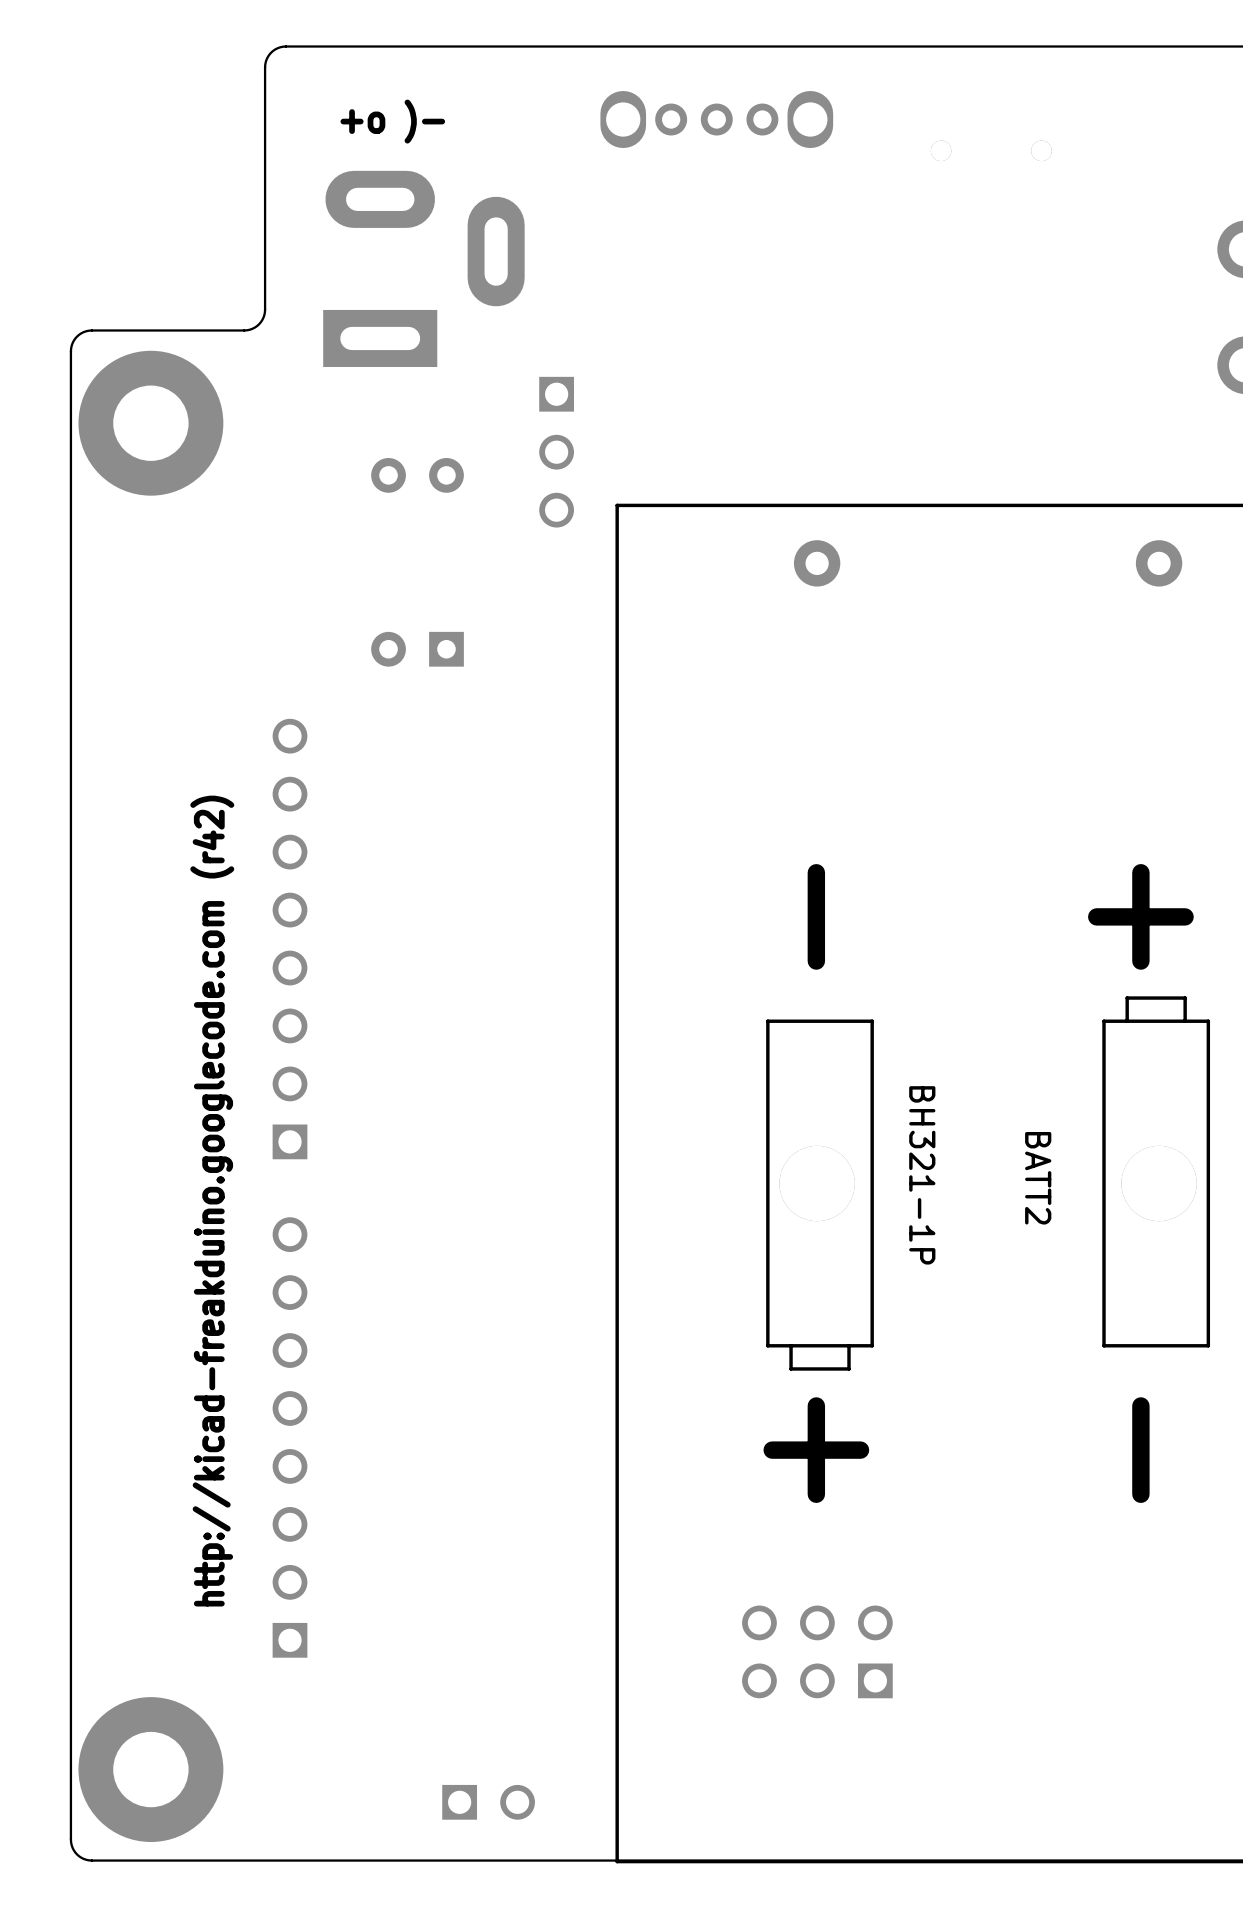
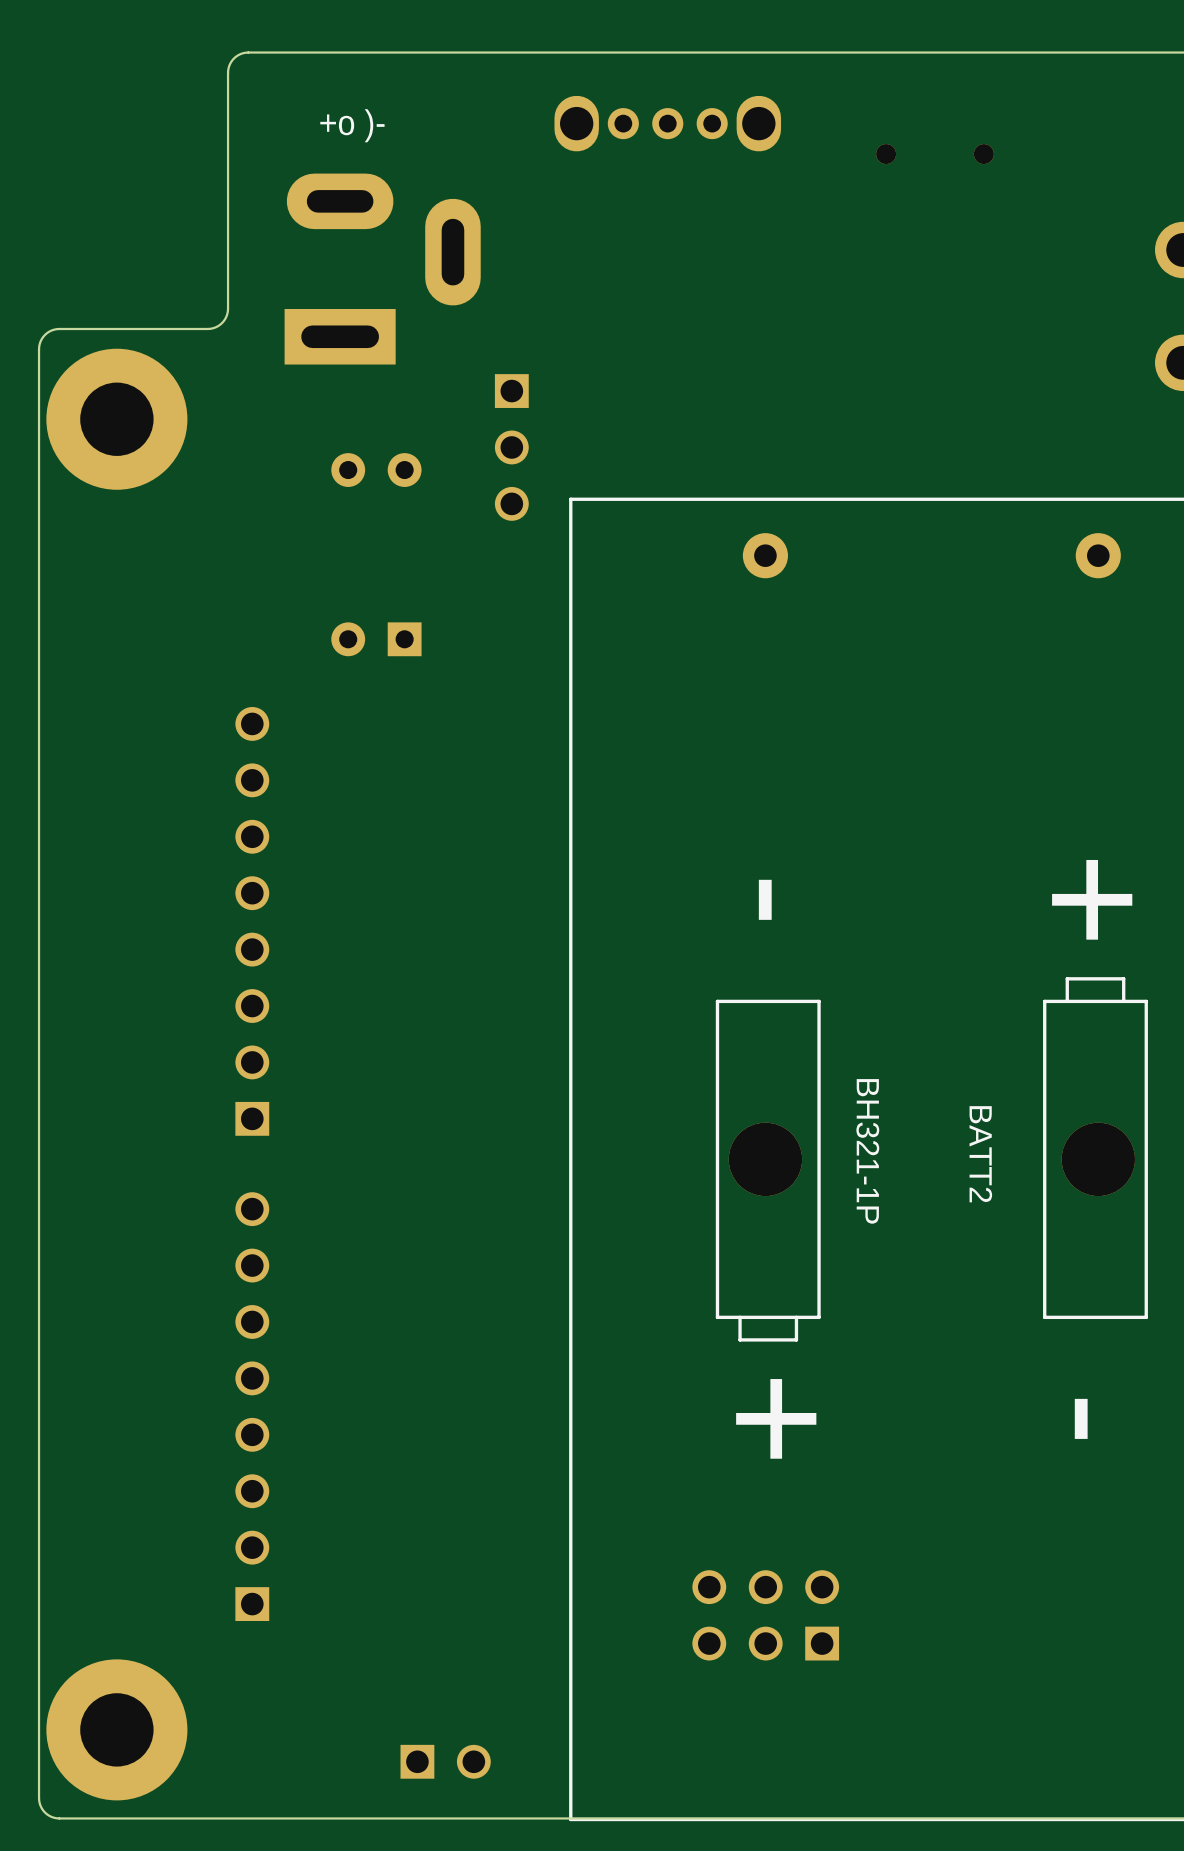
text: http://kicad-freakduino.googlecode.com (r42) (212, 1201) -> none

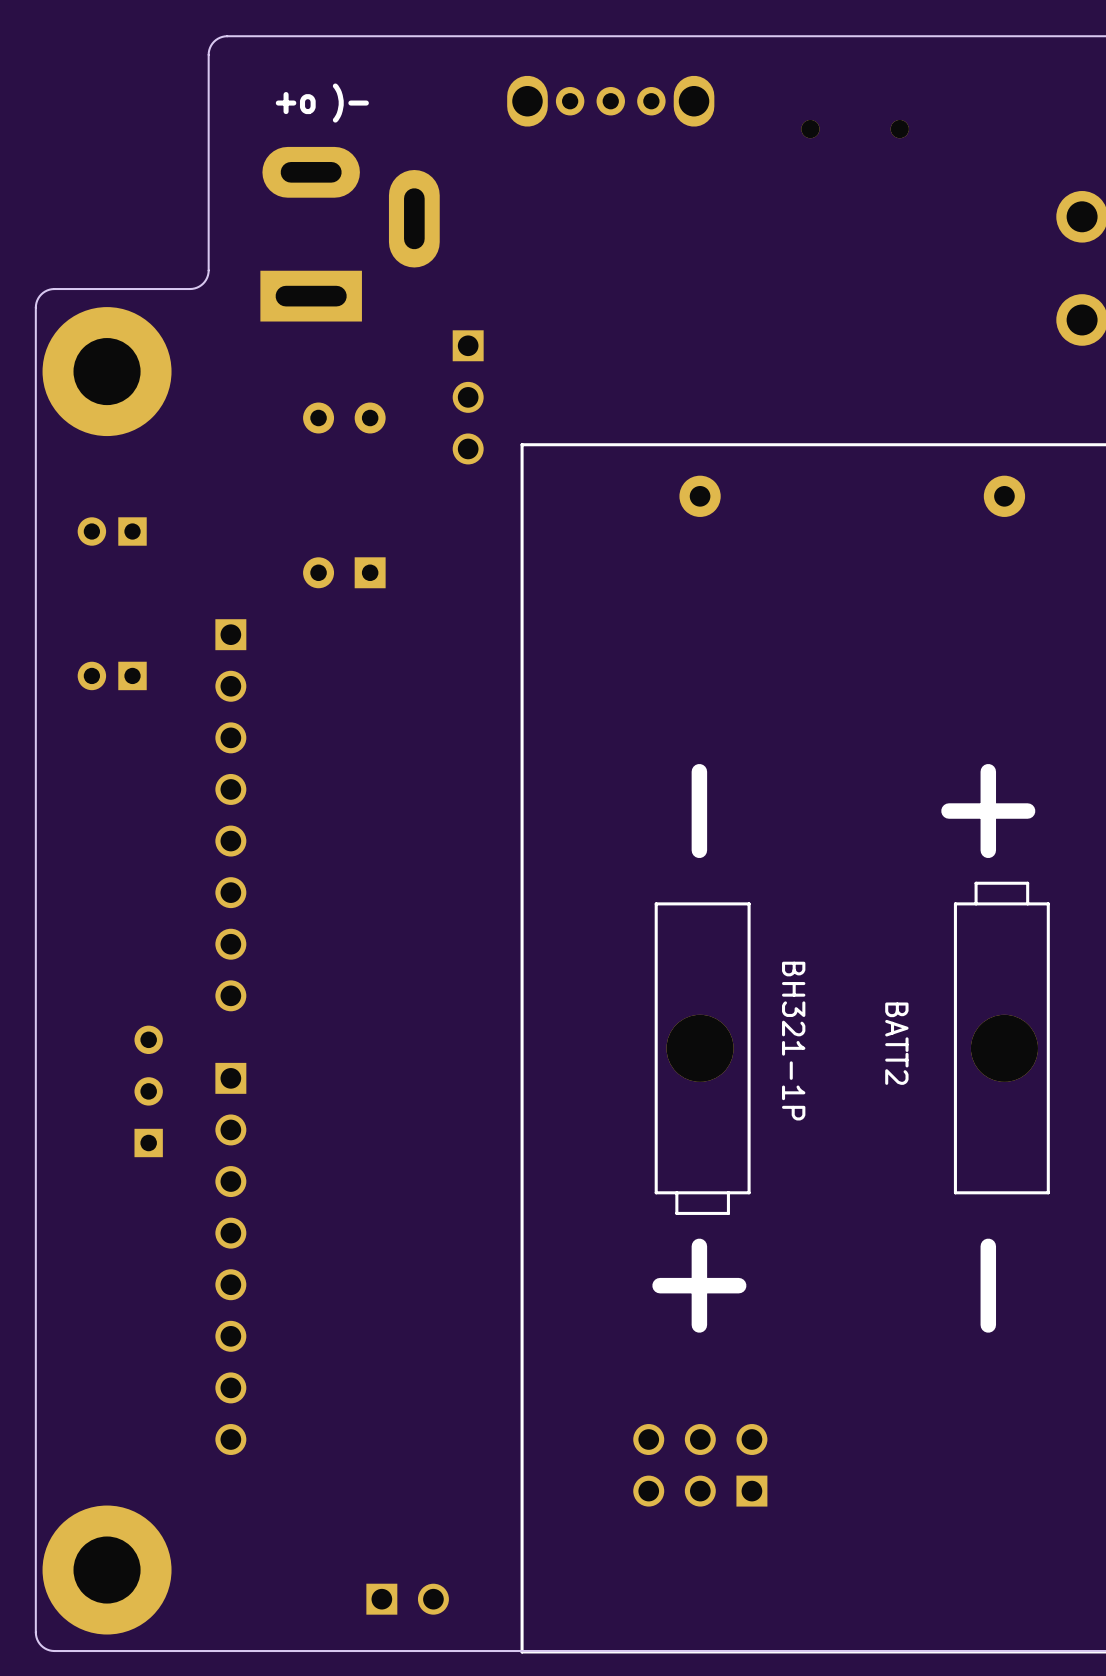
part: none -> (112, 531)
part: none -> (112, 675)
part rotation: 0° (252, 921) -> 180° (230, 815)
part: none -> (148, 1091)
part rotation: 0° (252, 1406) -> 180° (230, 1258)

